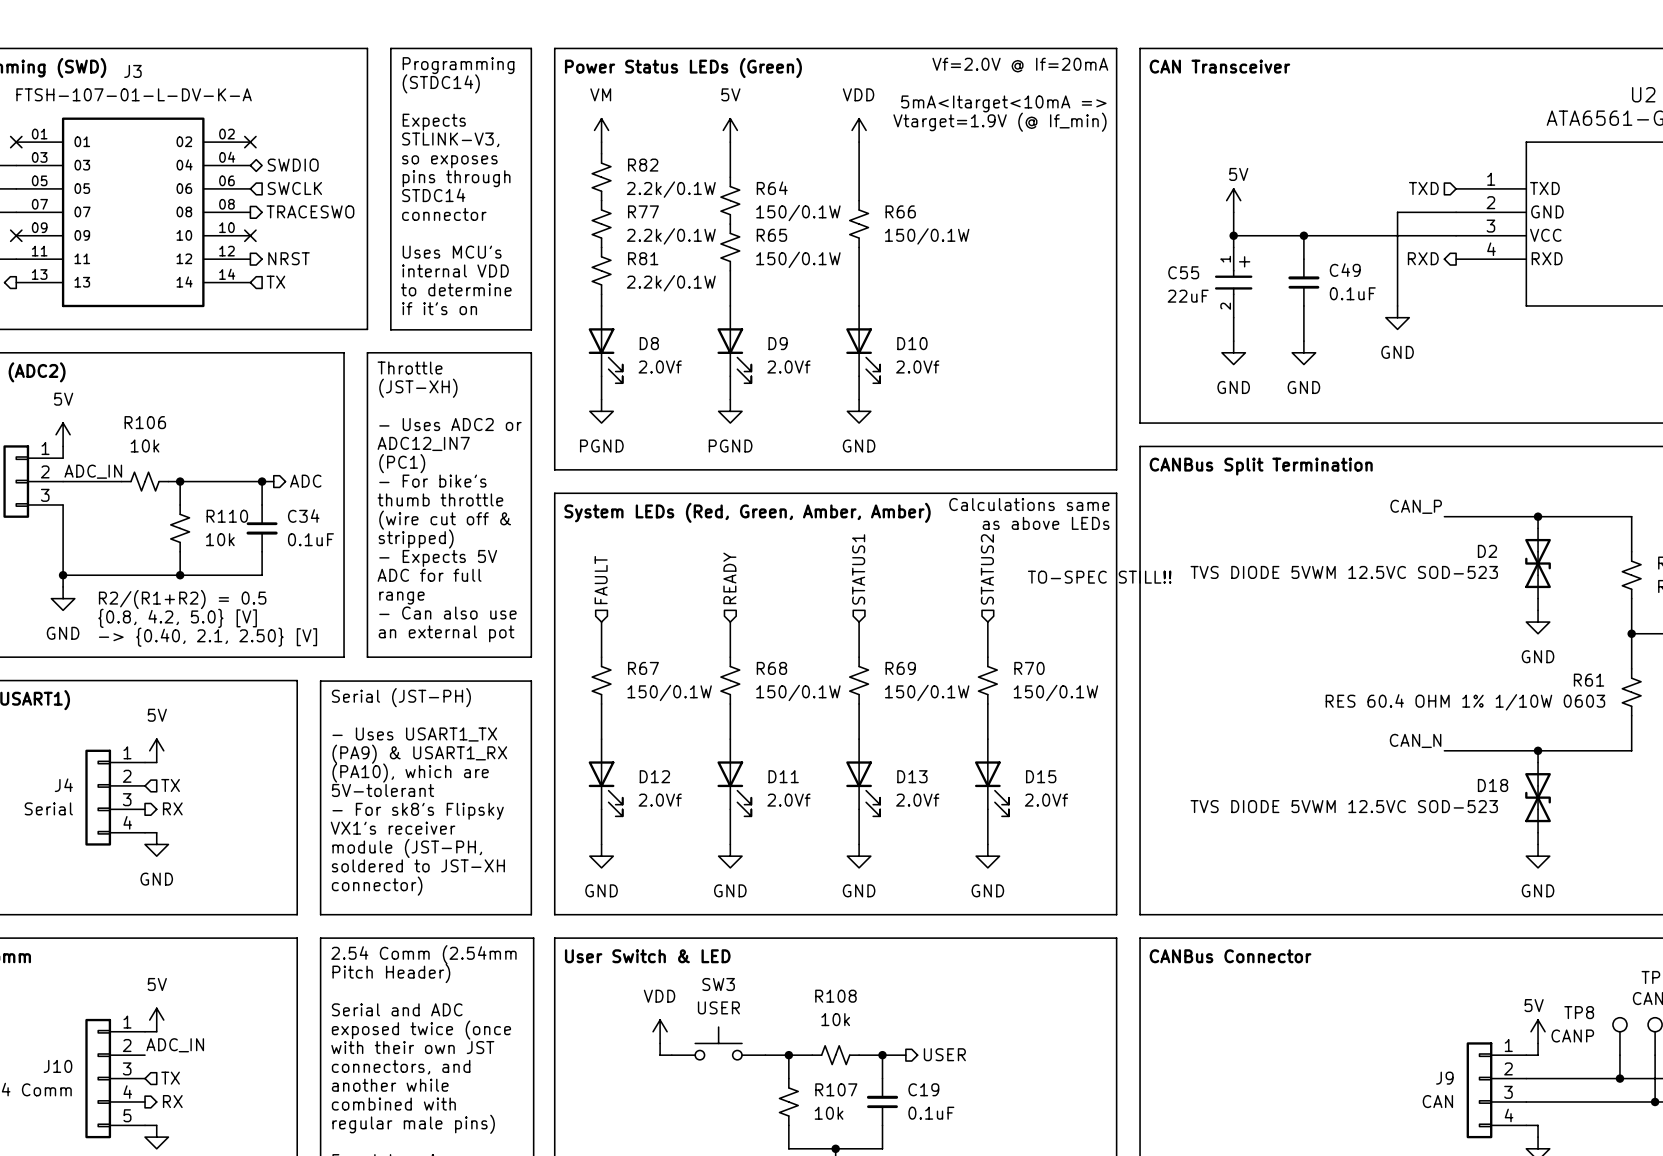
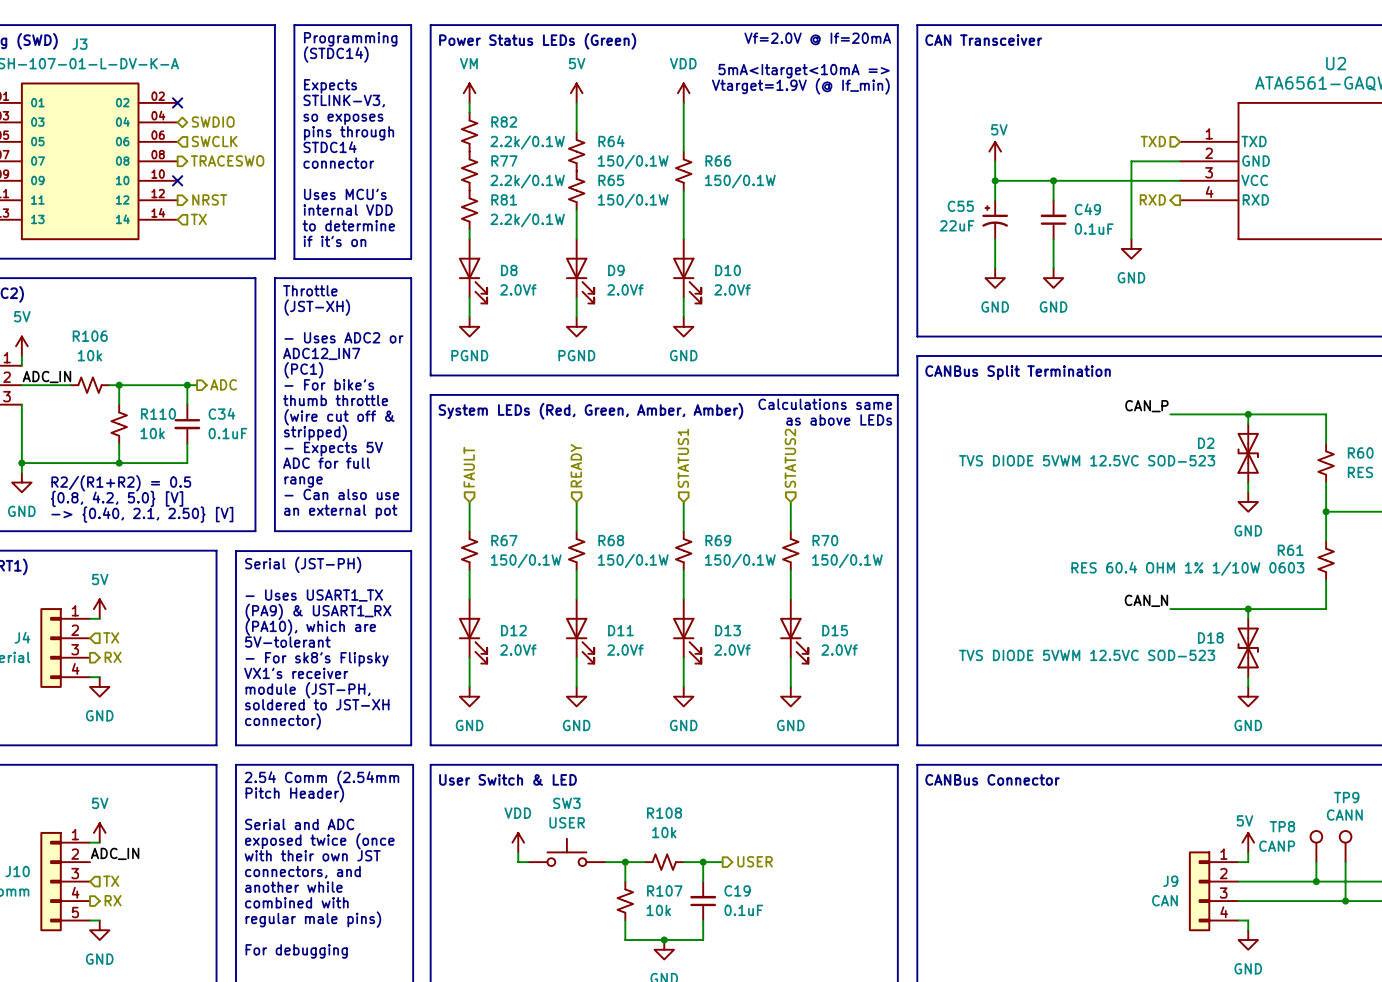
C55 symbol: [1214, 247, 1253, 318] -> [982, 200, 1009, 240]
text: TO-SPEC STILL!! (1099, 577) -> none

